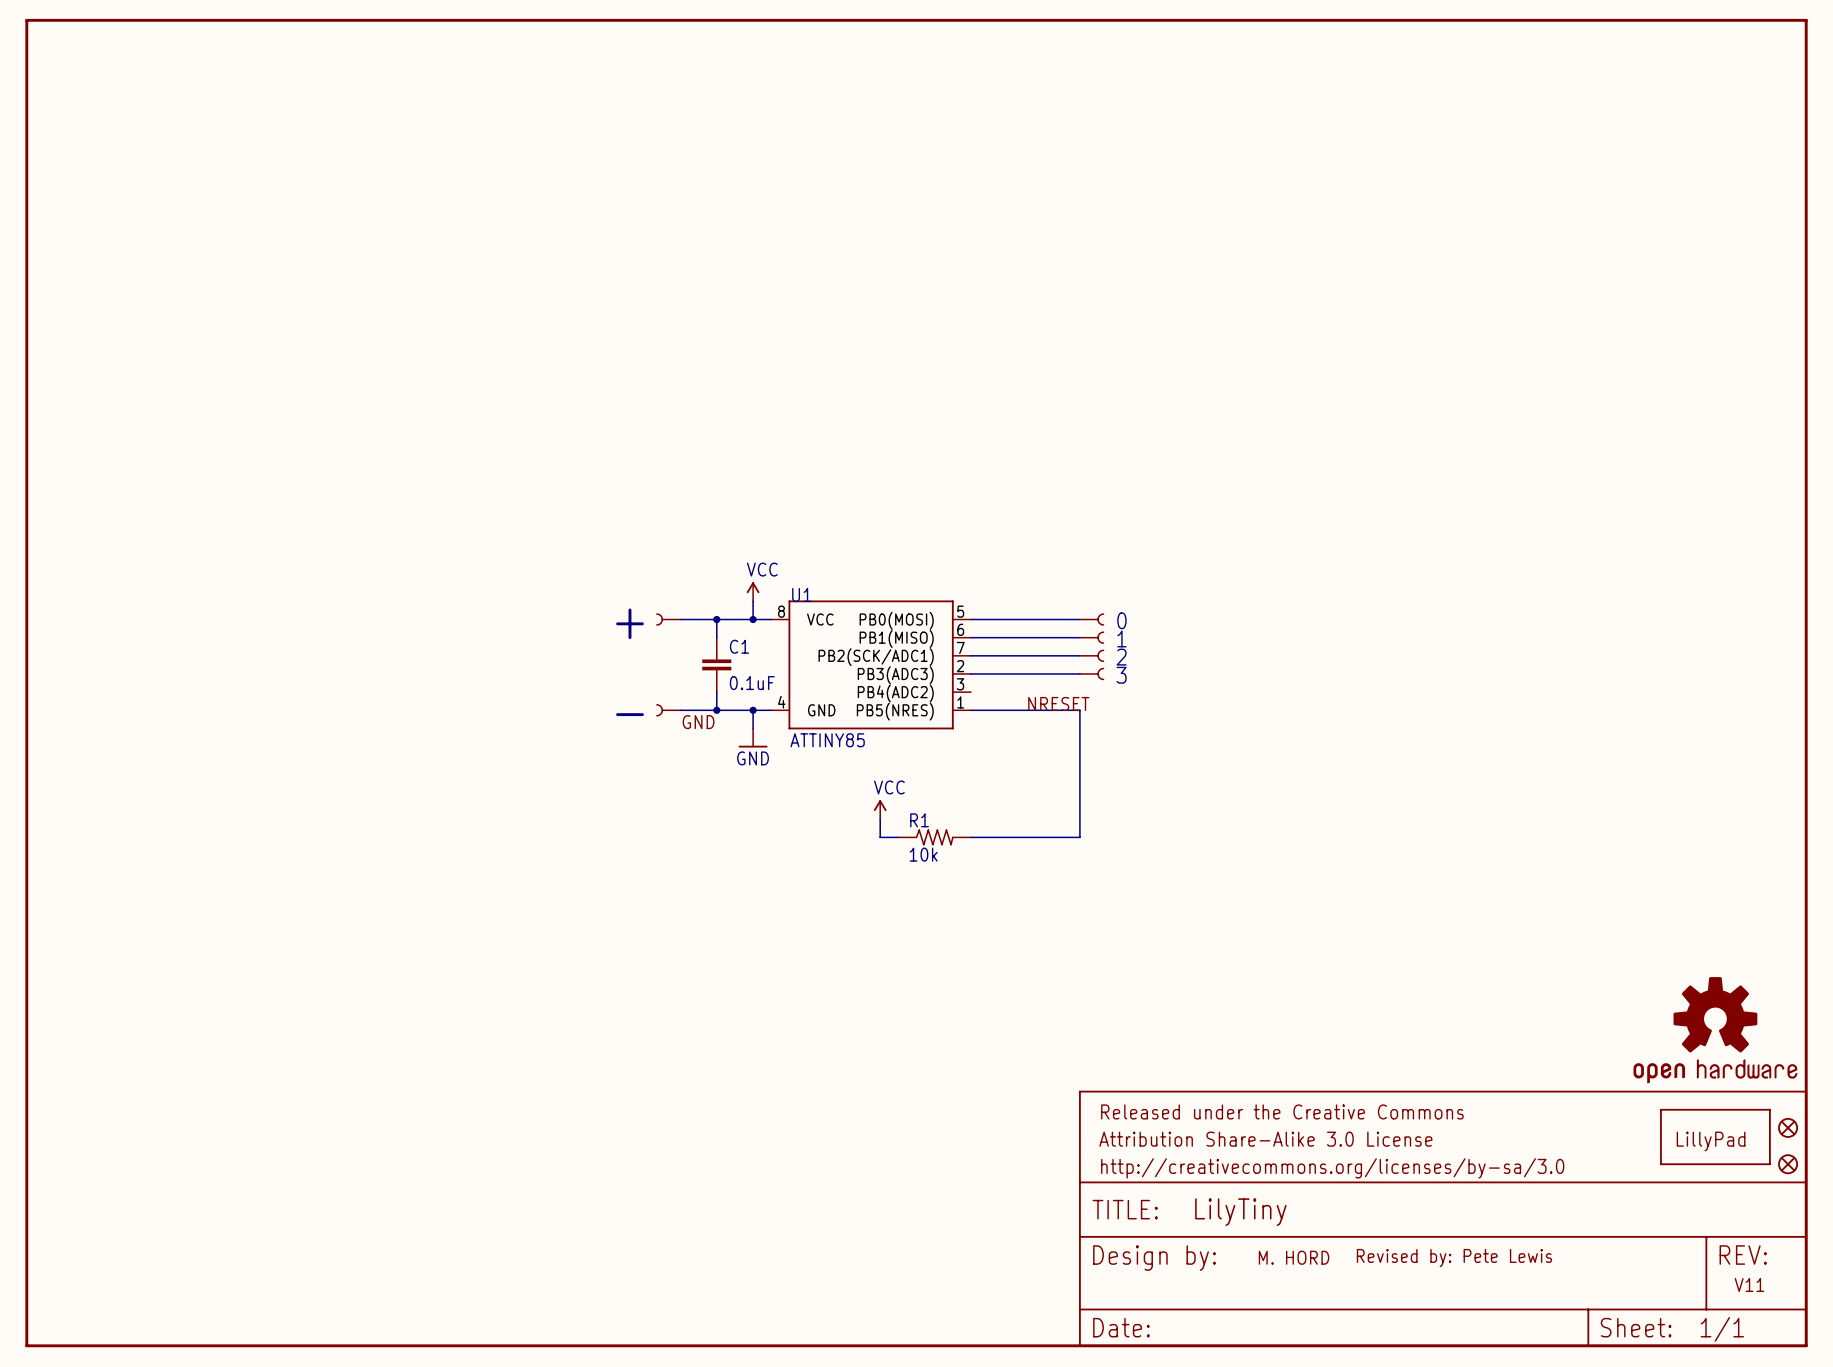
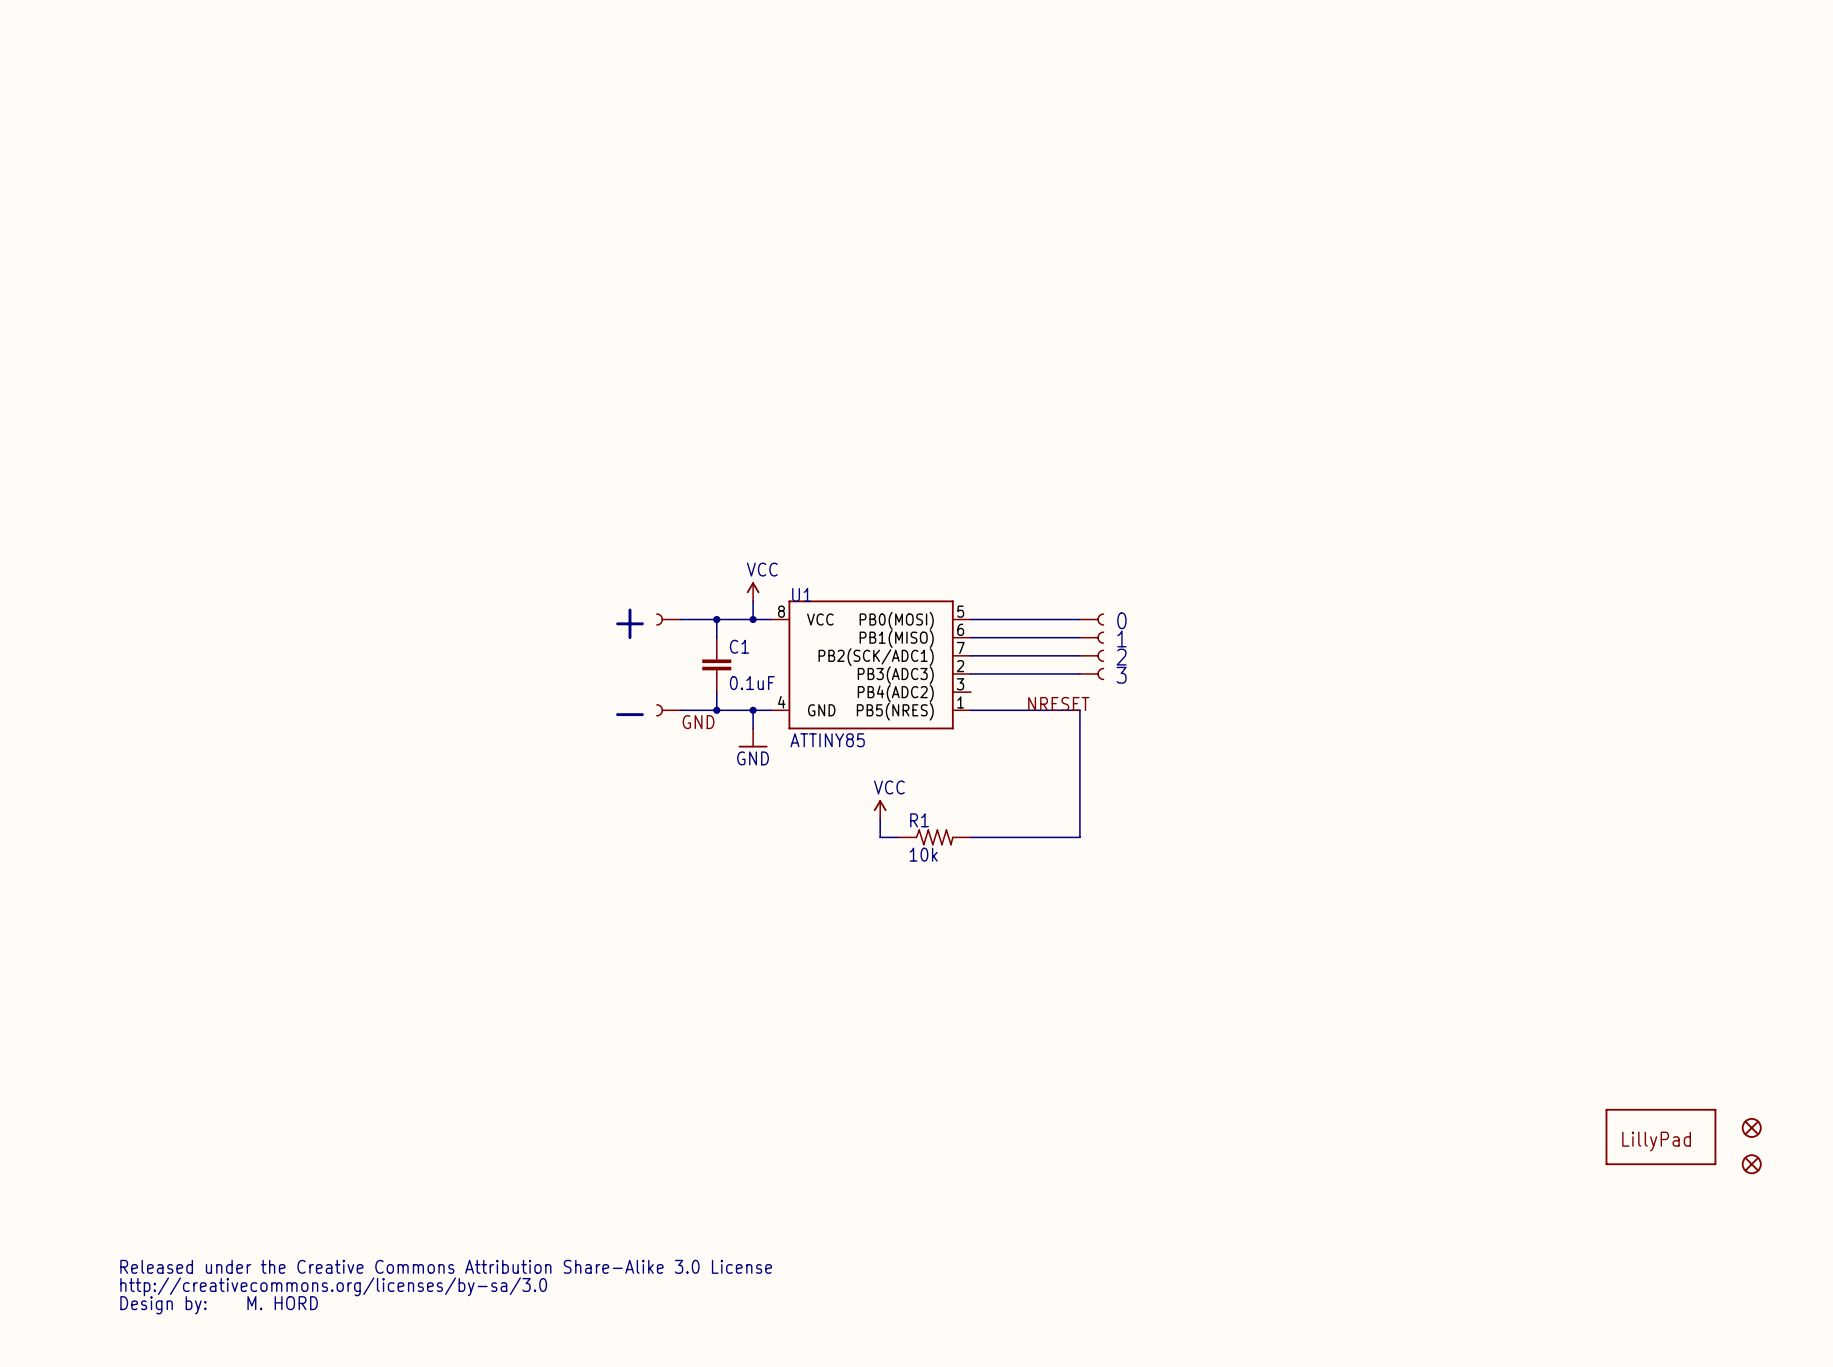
part: (916, 683) -> none
part: (1715, 1030) -> none
part: none -> (1751, 1127)
part: (1788, 1127) -> none
part position: (1715, 1137) -> (1660, 1137)
part: none -> (1751, 1164)
part: (1788, 1164) -> none
part: (1443, 1218) -> none
text: M. HORD (1294, 1257) -> none
text: Revised by: Pete Lewis (1454, 1258) -> none
text: V11 (1749, 1284) -> none
part: none -> (446, 1287)
text: none -> M. HORD (282, 1303)

